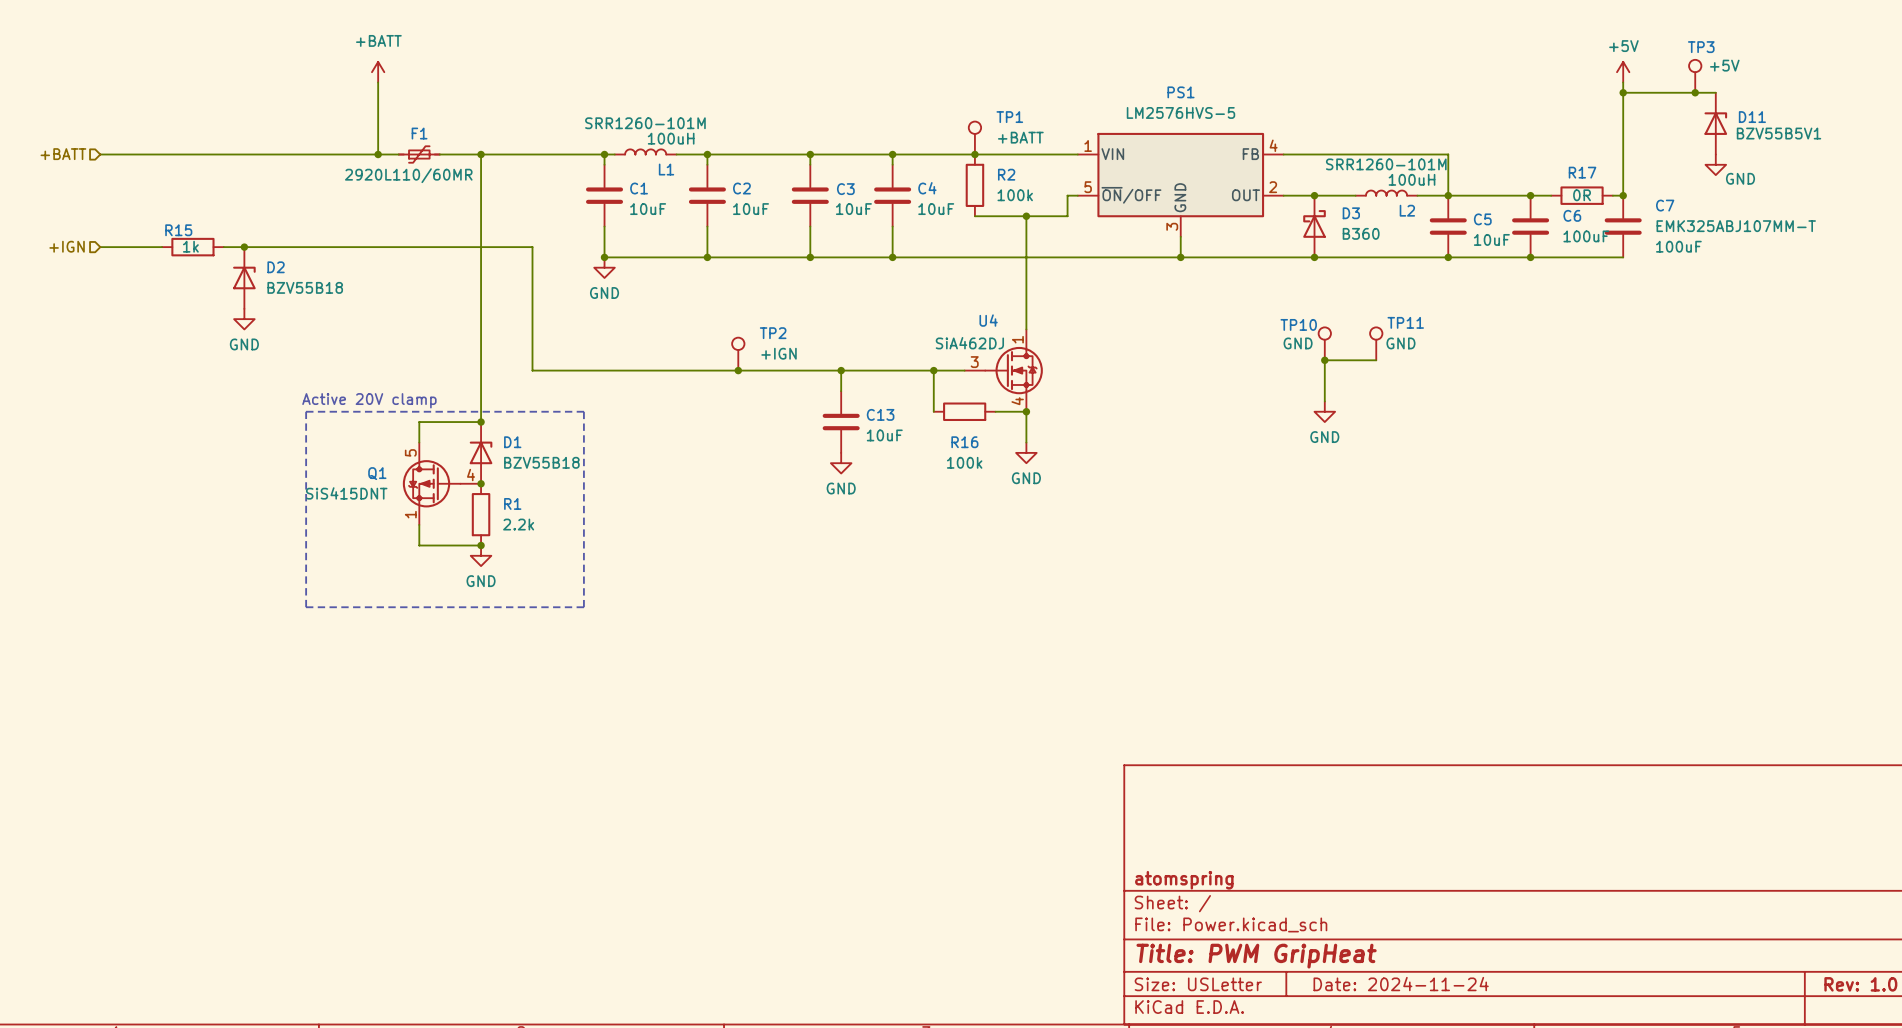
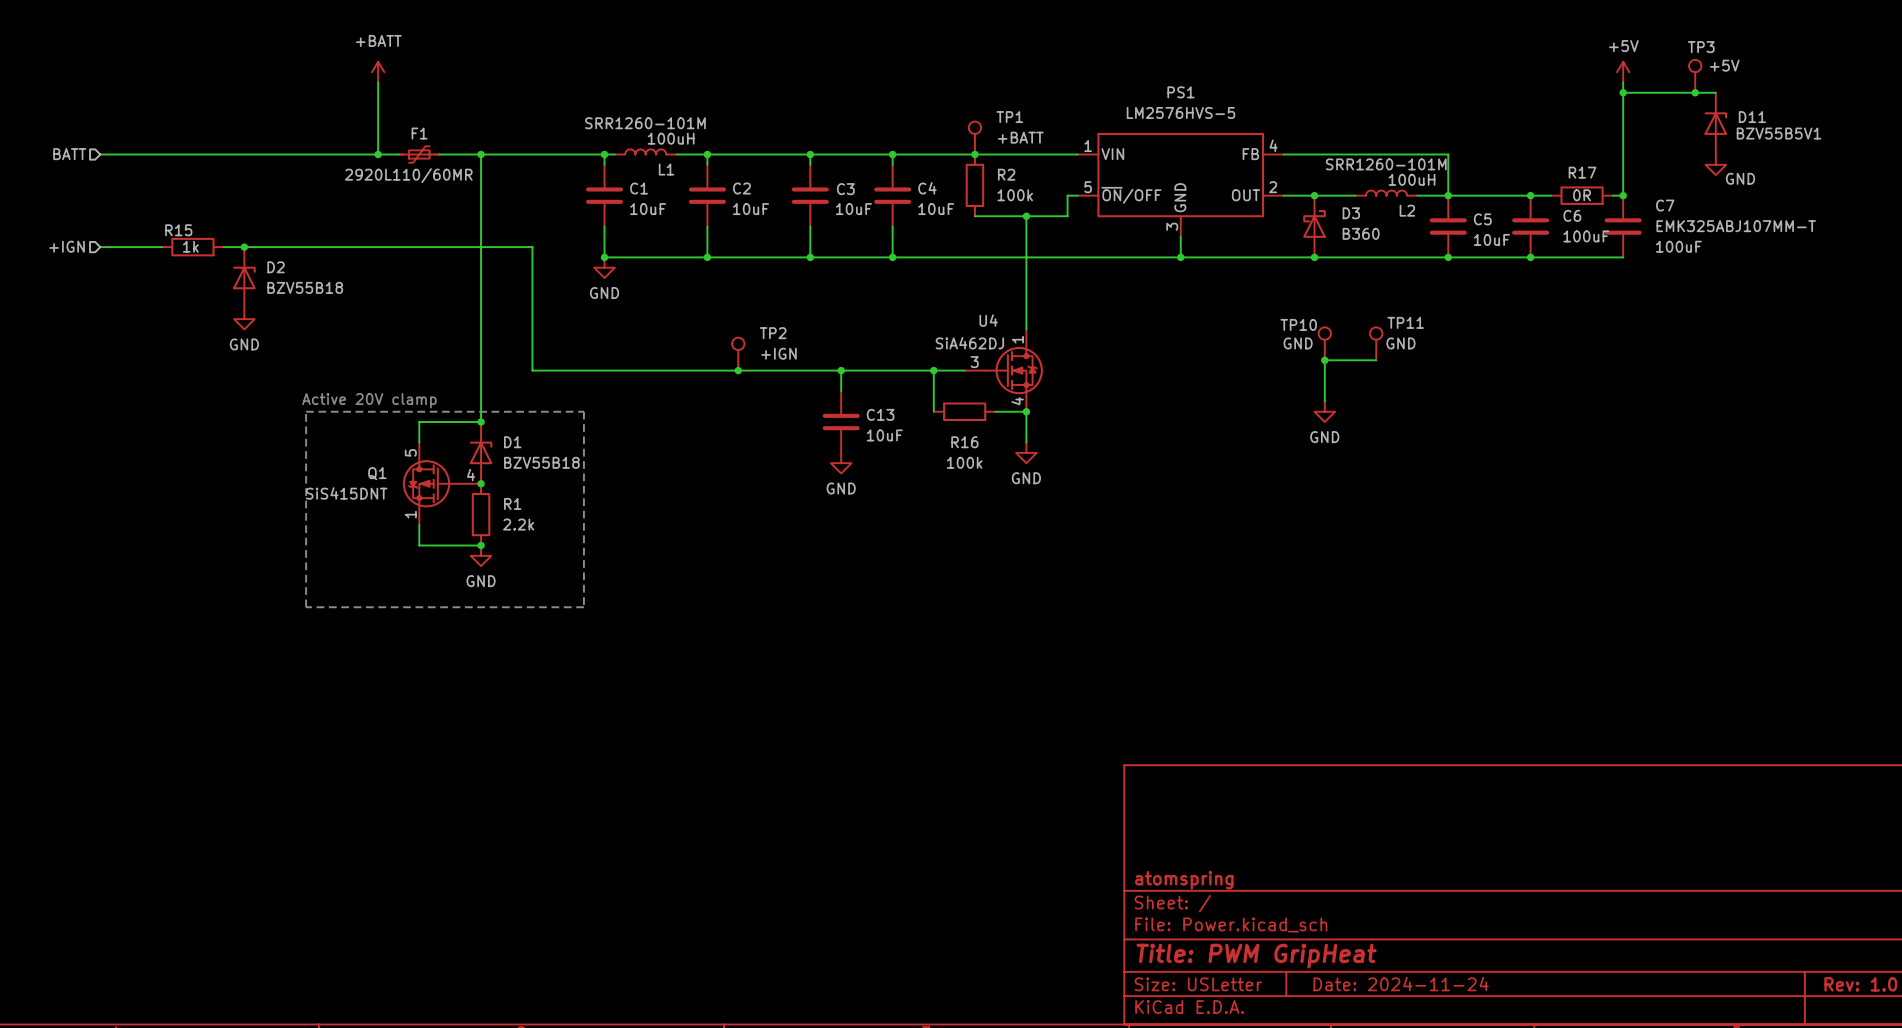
hierarchical label: +BATT (63, 154) -> BATT (69, 154)

